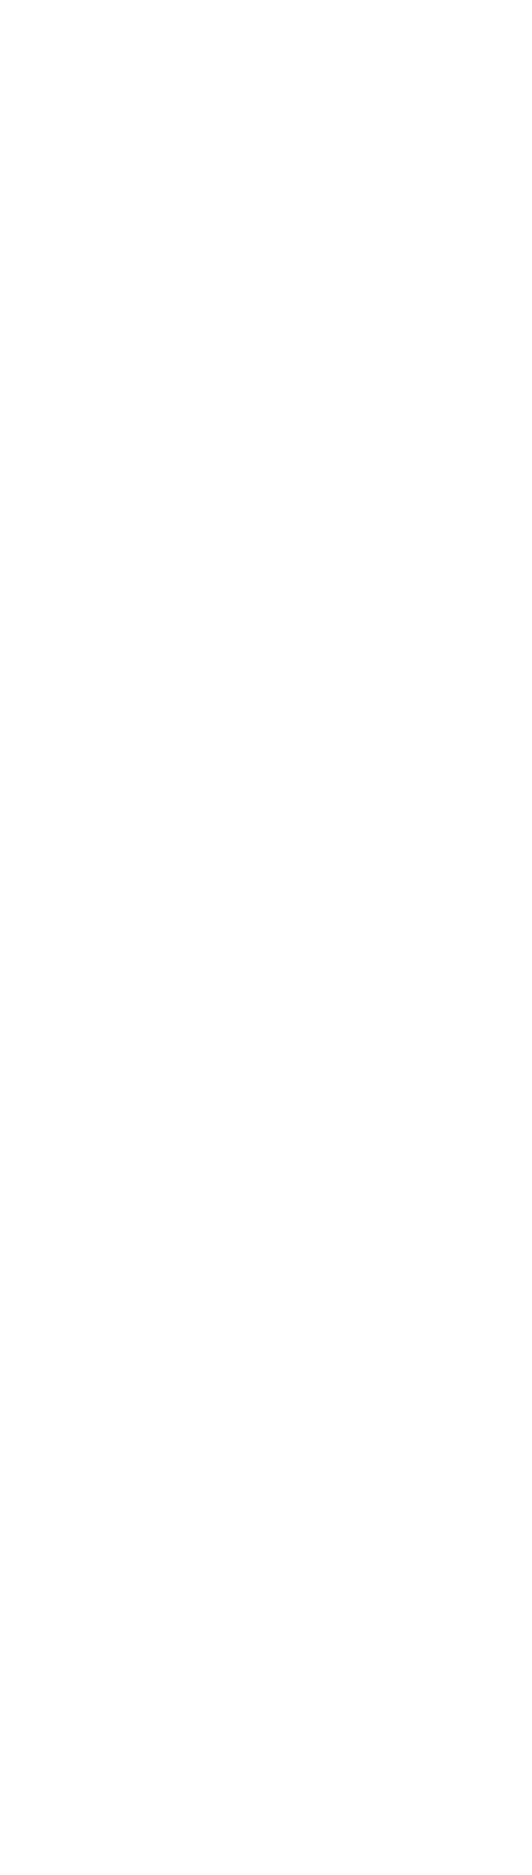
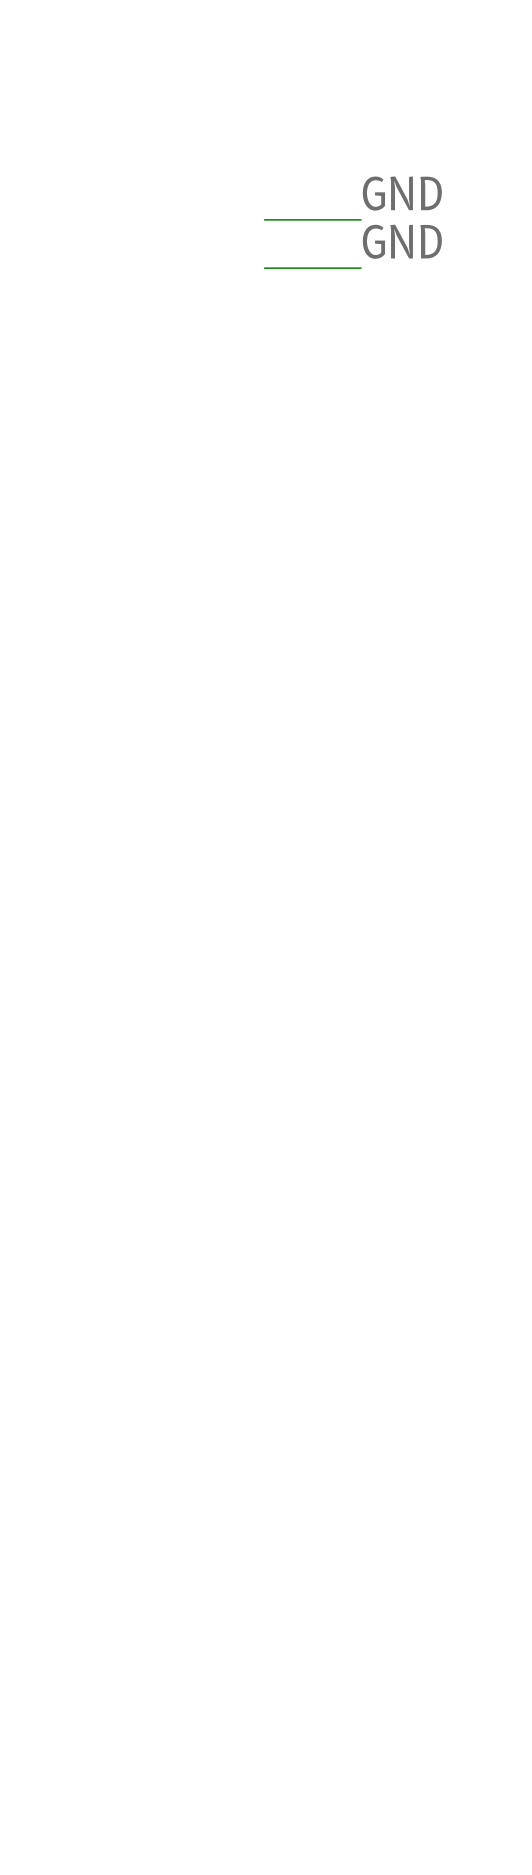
label: none -> GND (402, 193)
wire: none -> (264, 219) (361, 219)
label: none -> GND (402, 241)
wire: none -> (264, 268) (361, 268)

